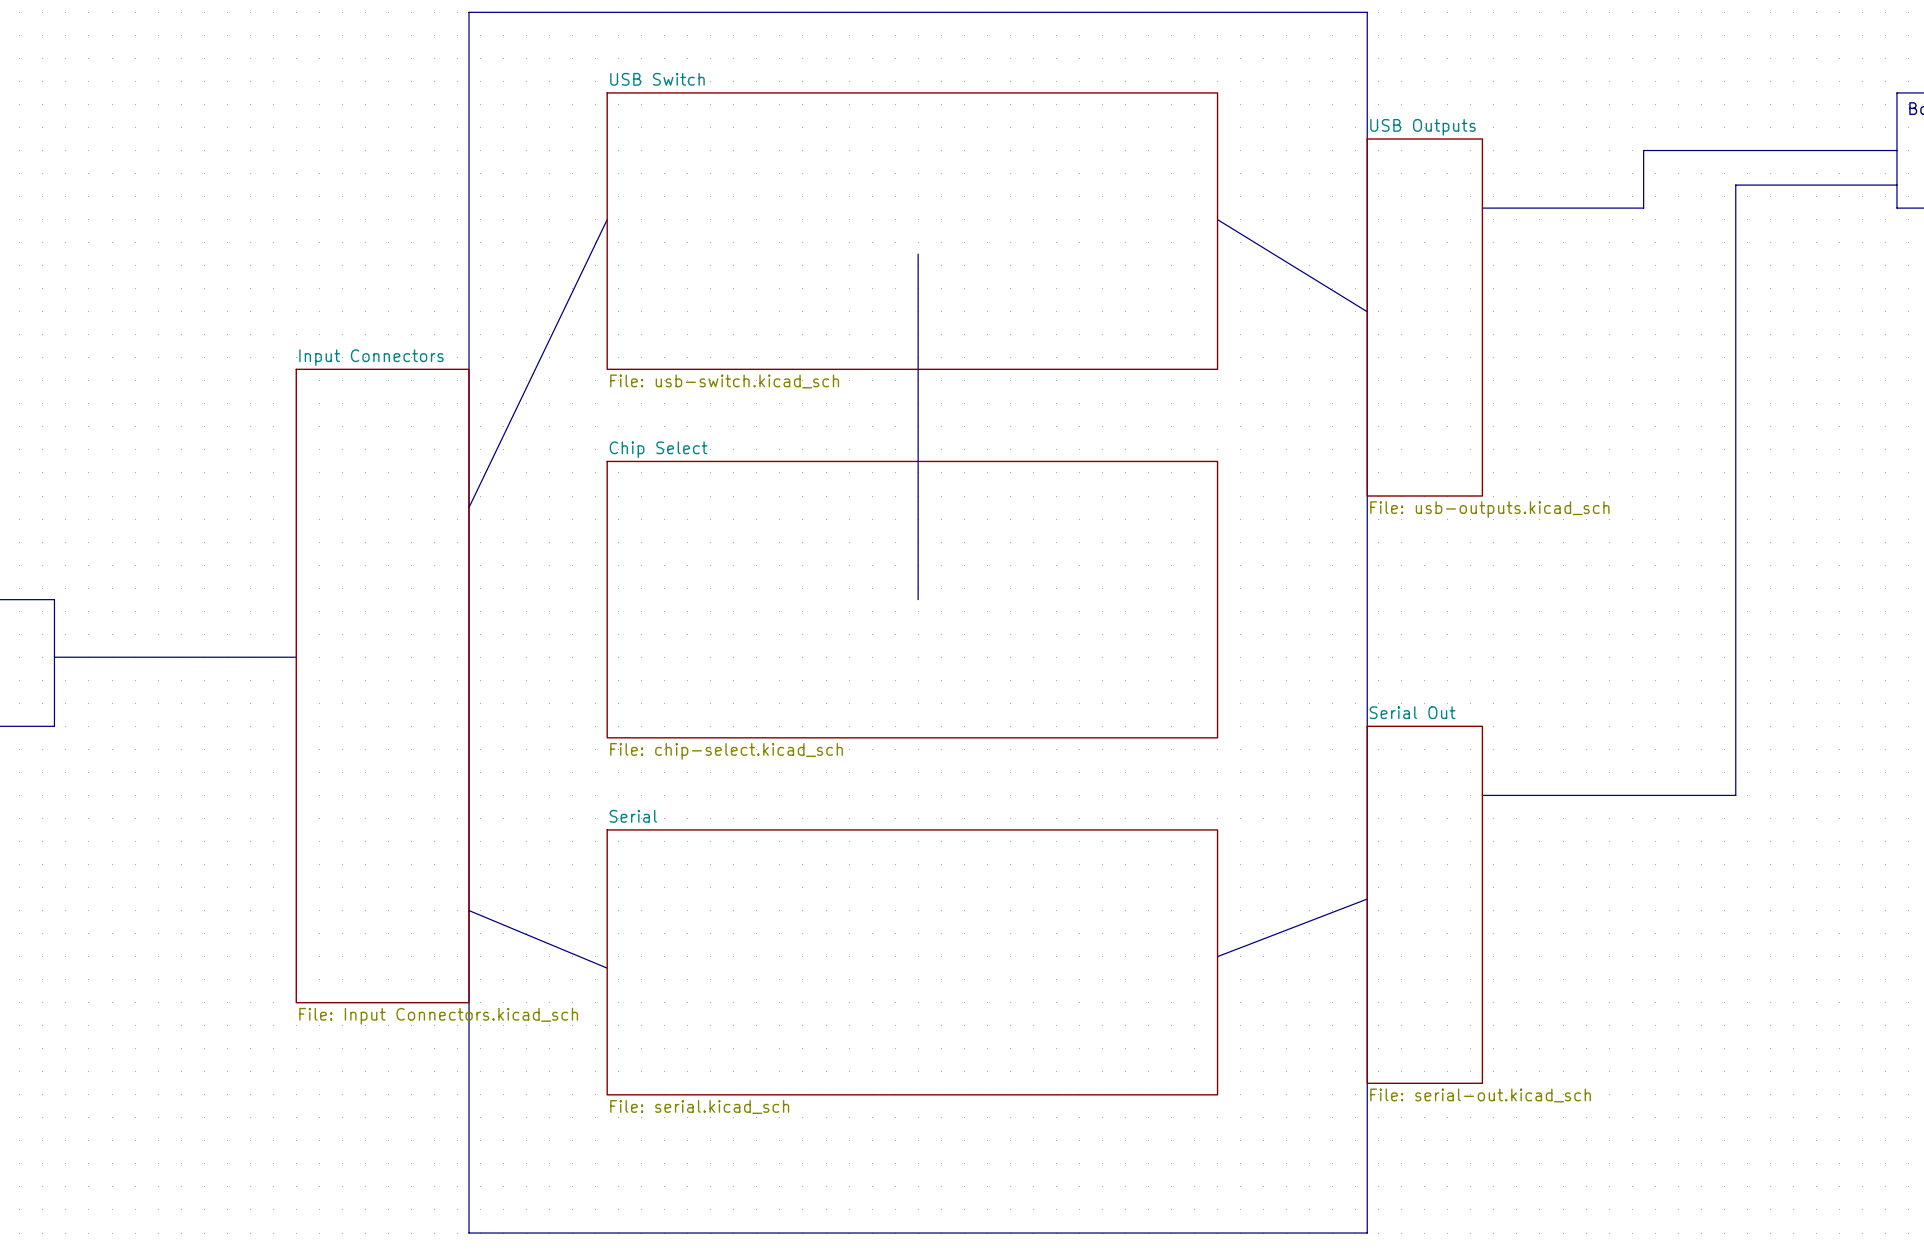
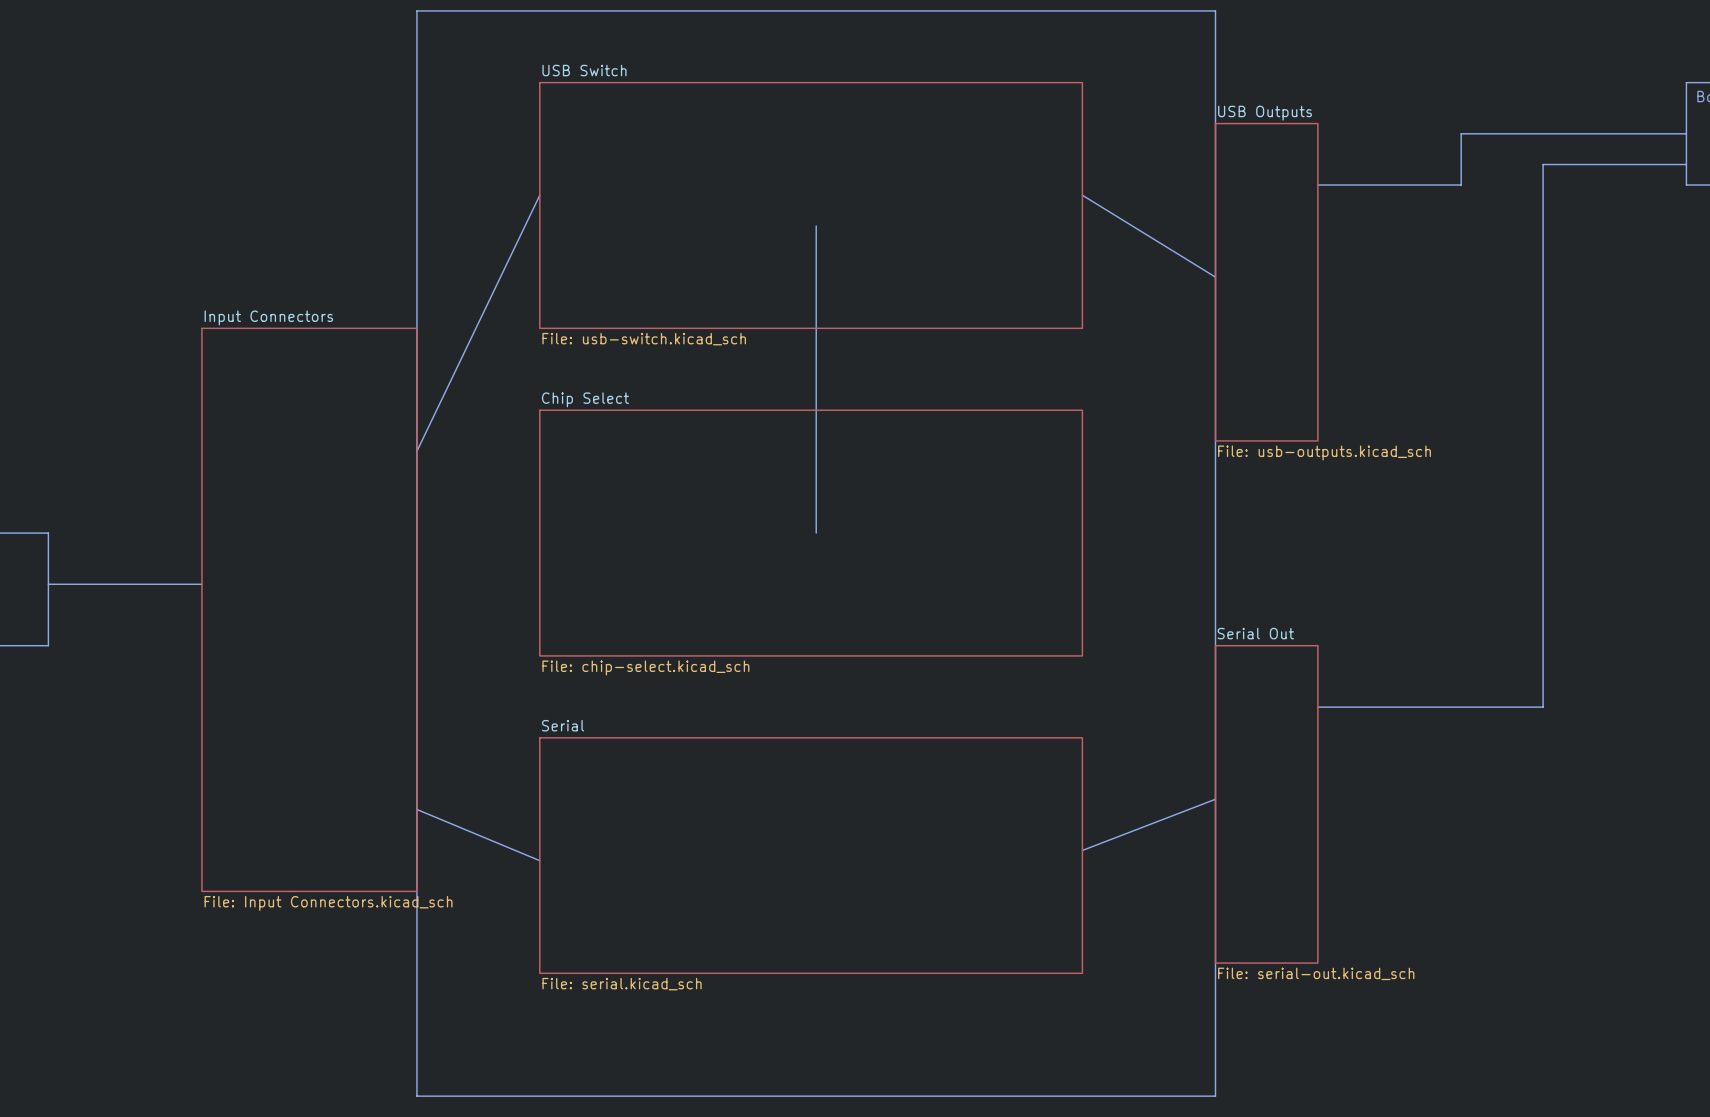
line: (227, 657) (296, 657) -> none
sheet Input Connectors: none -> File: Input Connectors.kicad_sch (309, 609)
sheet Input Connectors: File: Input Connectors.kicad_sch (382, 686) -> none

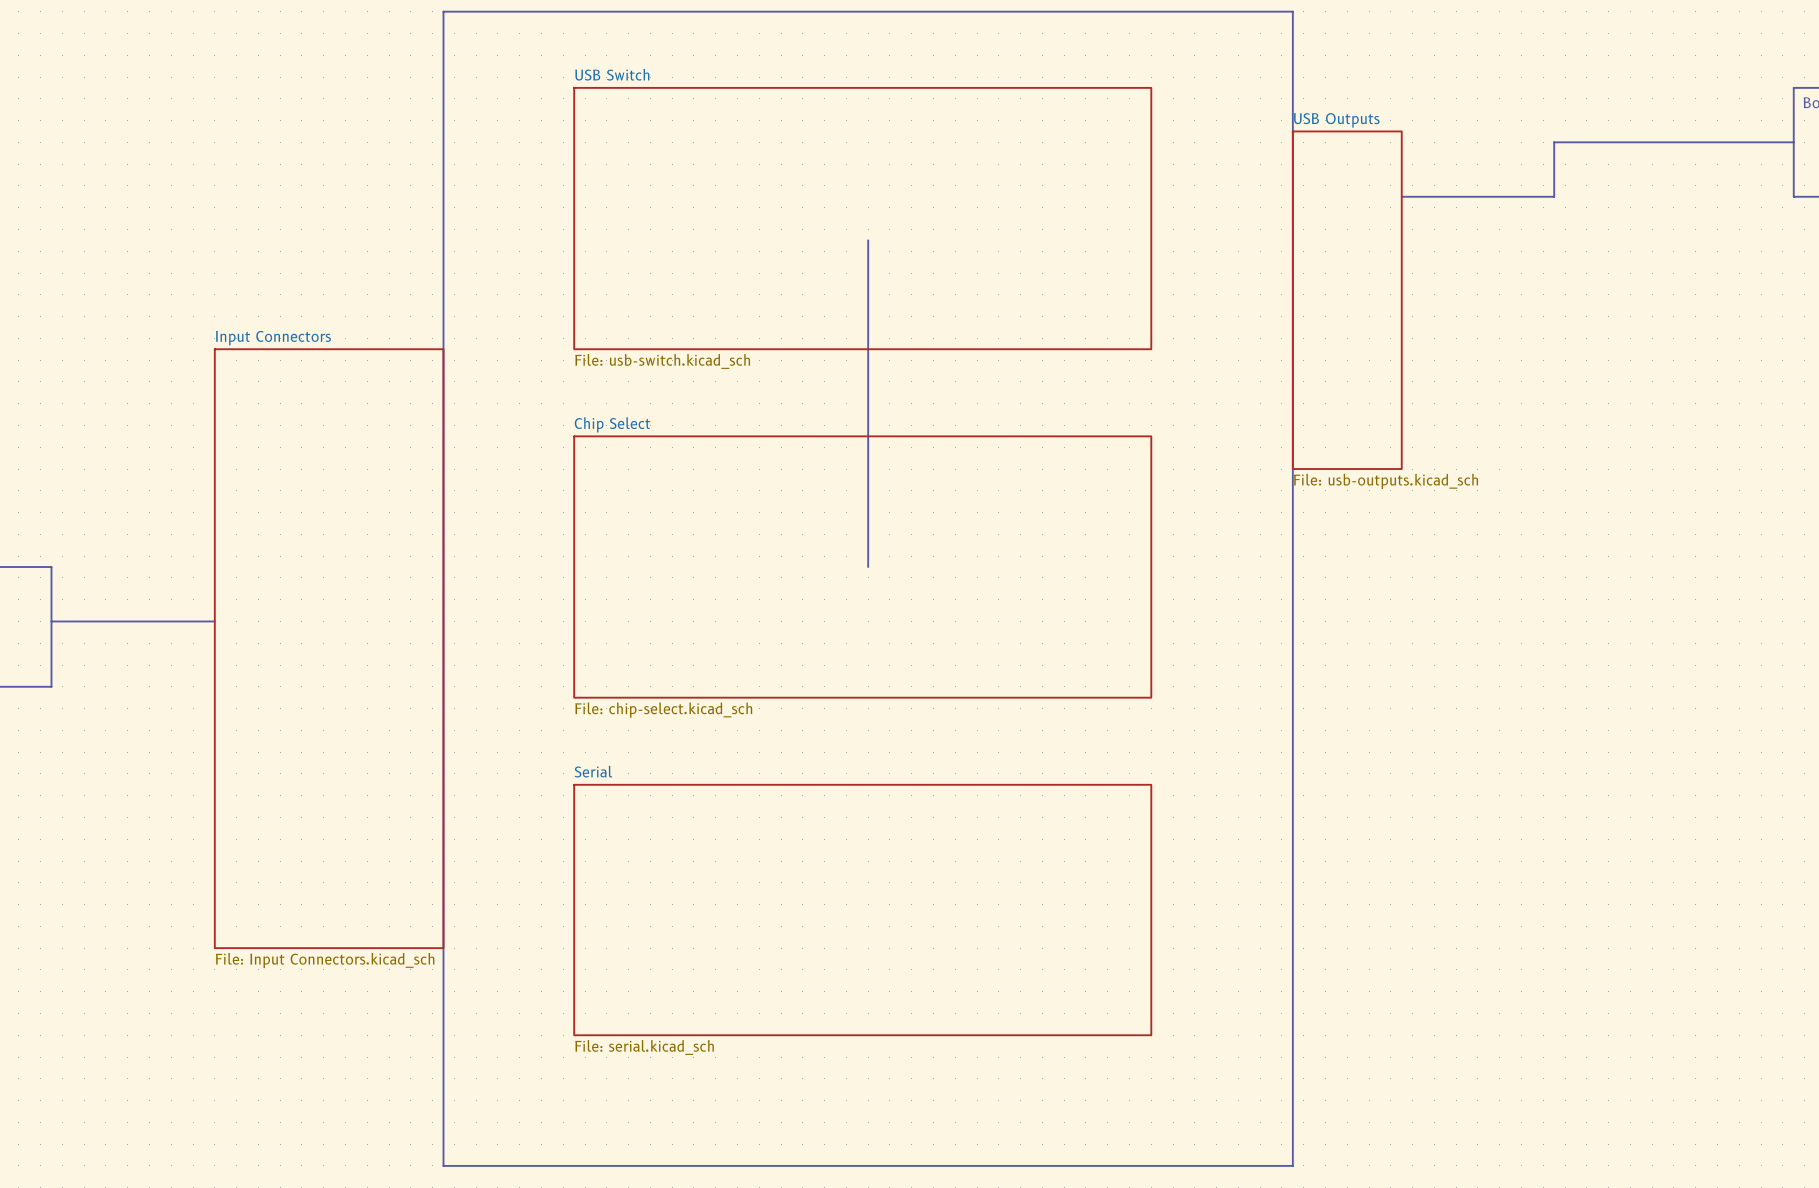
line: (1686, 164) (1543, 164) (1543, 707) (1317, 707) -> none
line: (539, 195) (416, 451) -> none
line: (1082, 195) (1215, 277) -> none
line: (1215, 799) (1082, 850) -> none
sheet Serial Out: File: serial-out.kicad_sch (1266, 804) -> none
line: (416, 809) (539, 860) -> none

